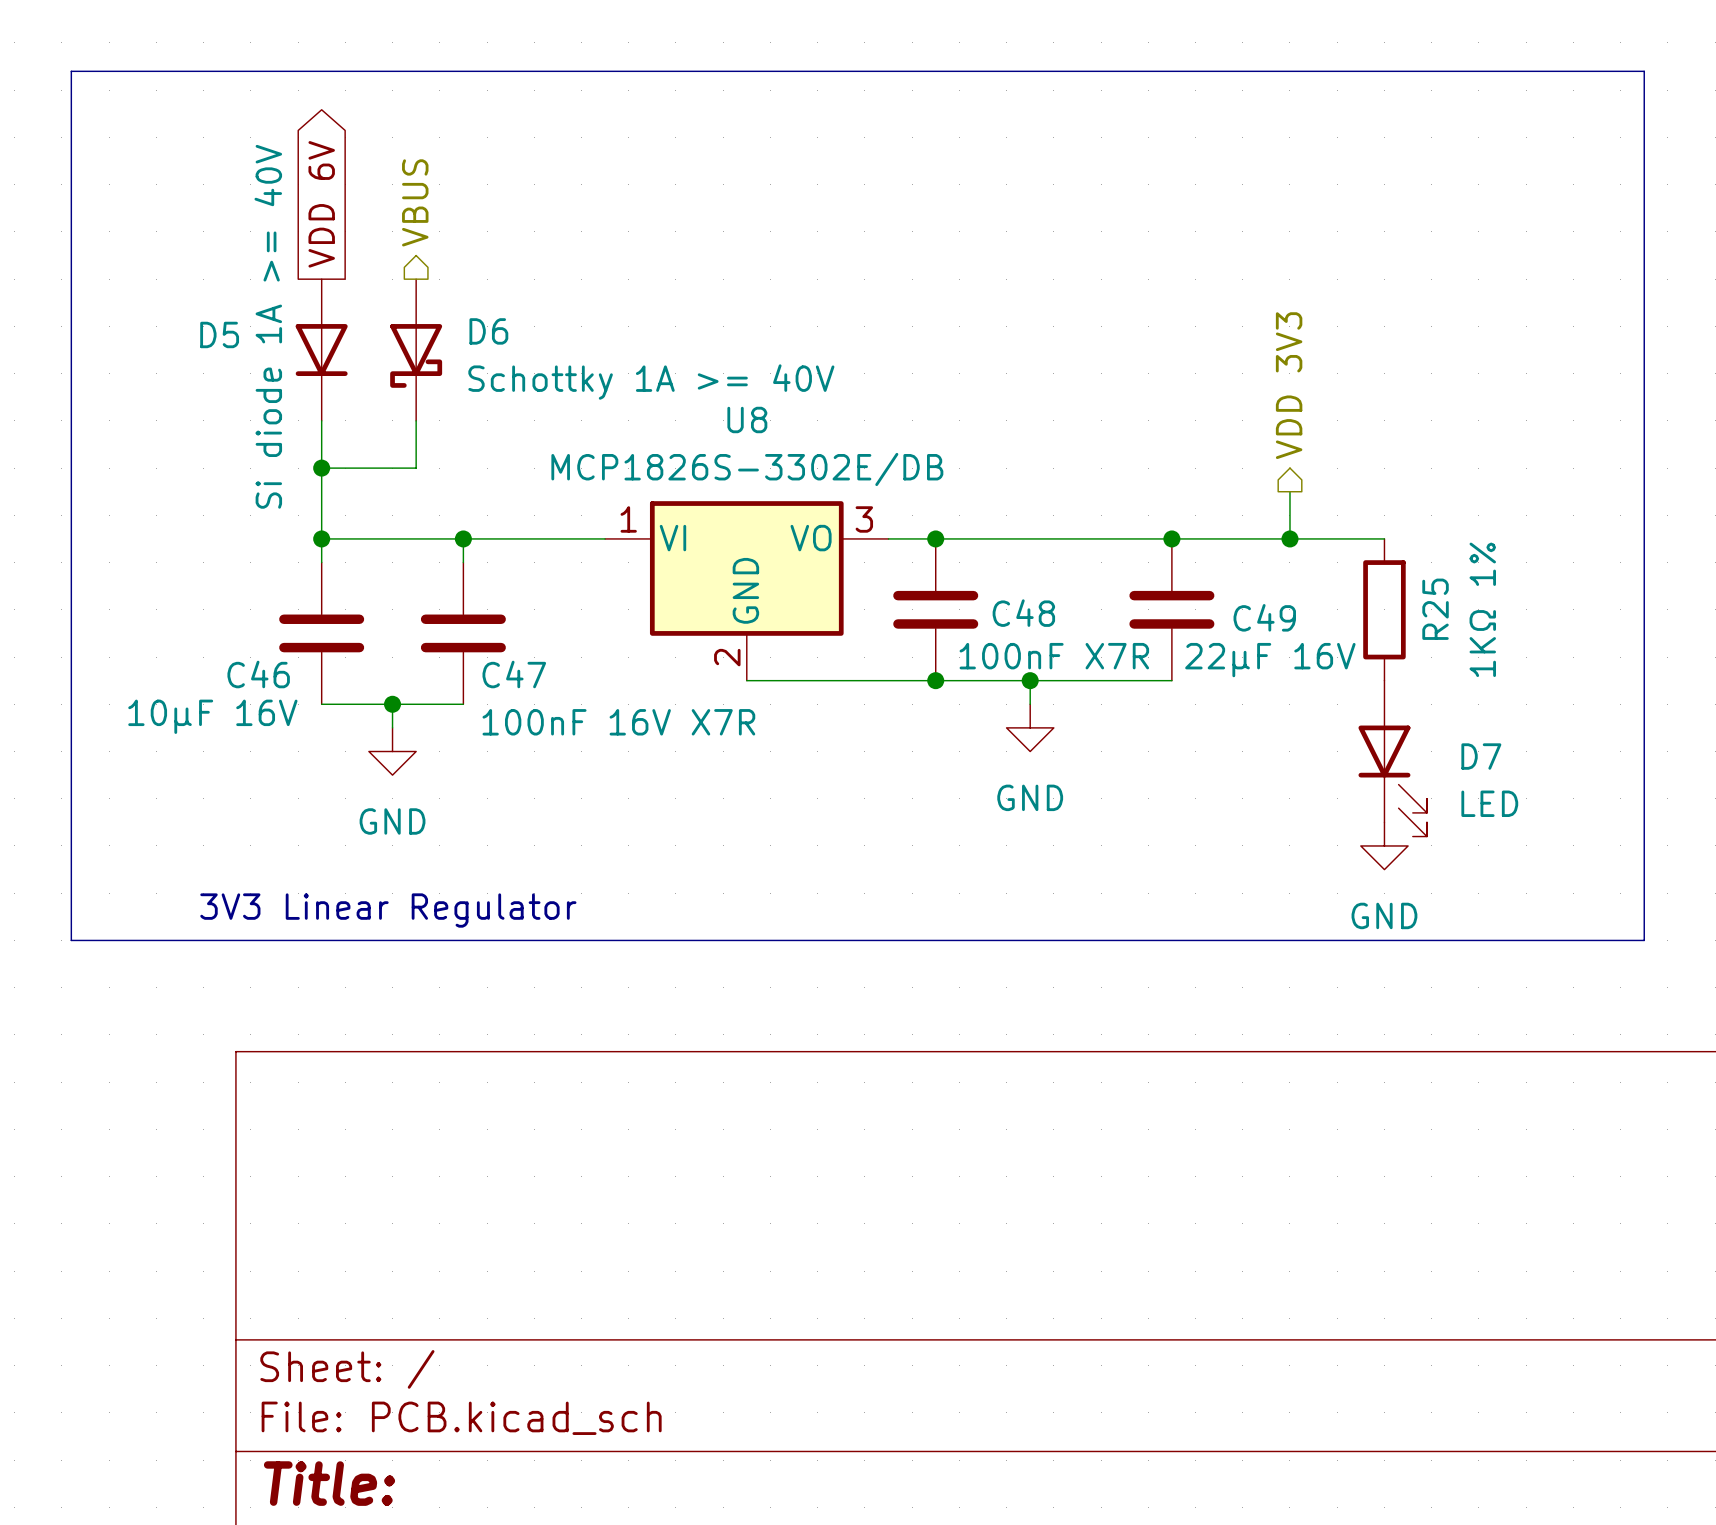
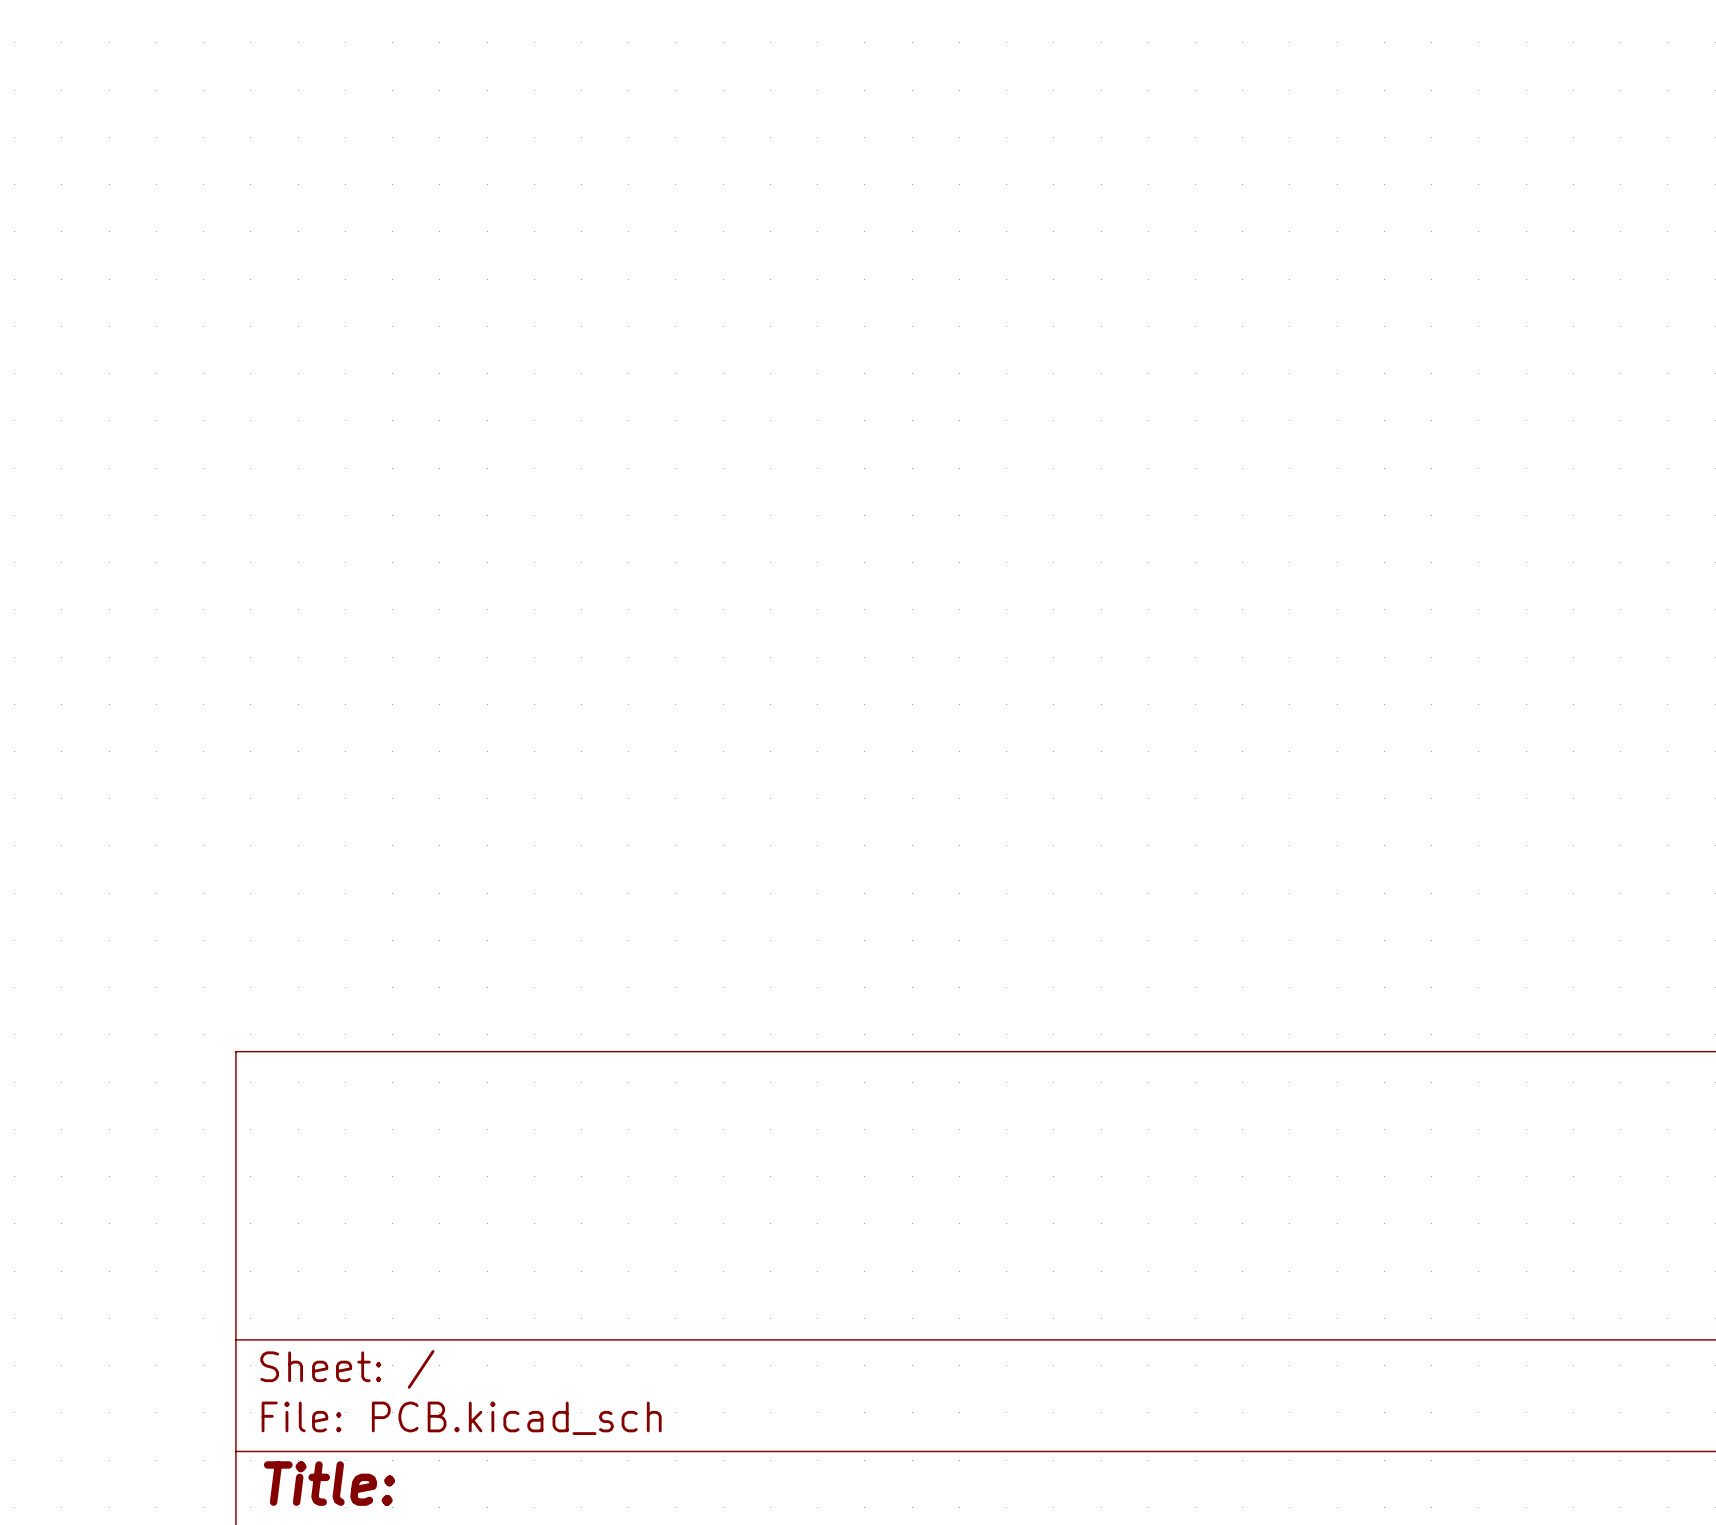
line: (71, 71) (1644, 71) (1644, 940) (71, 940) (71, 71) -> none
hierarchical label: VBUS (415, 202) -> none
global label: VDD 6V (321, 204) -> none
D5: Si diode 1A >= 40V (321, 350) -> none
D6: Schottky 1A >= 40V (416, 350) -> none
hierarchical label: VDD 3V3 (1289, 385) -> none
wire: (321, 420) (321, 562) -> none
wire: (416, 420) (416, 468) (321, 468) -> none
junction: (321, 468) -> none
wire: (1289, 491) (1289, 538) -> none
wire: (321, 538) (605, 538) -> none
junction: (321, 538) -> none
wire: (463, 538) (463, 562) -> none
junction: (463, 538) -> none
wire: (888, 538) (1384, 538) -> none
junction: (935, 538) -> none
junction: (1171, 538) -> none
junction: (1289, 538) -> none
U8: MCP1826S-3302E/DB (746, 590) -> none
C48: 100nF X7R (935, 609) -> none
C49: 22µF 16V (1171, 609) -> none
R25: 1KΩ 1% (1384, 609) -> none
C46: 10µF 16V (321, 633) -> none
C47: 100nF 16V X7R (463, 633) -> none
wire: (746, 680) (1171, 680) -> none
junction: (935, 680) -> none
wire: (1030, 680) (1030, 704) -> none
junction: (1030, 680) -> none
wire: (321, 704) (463, 704) -> none
wire: (392, 704) (392, 727) -> none
junction: (392, 704) -> none
power symbol: GND (1030, 727) -> none
power symbol: GND (392, 751) -> none
D7: LED (1392, 758) -> none
power symbol: GND (1384, 845) -> none
text: 3V3 Linear Regulator (388, 910) -> none

